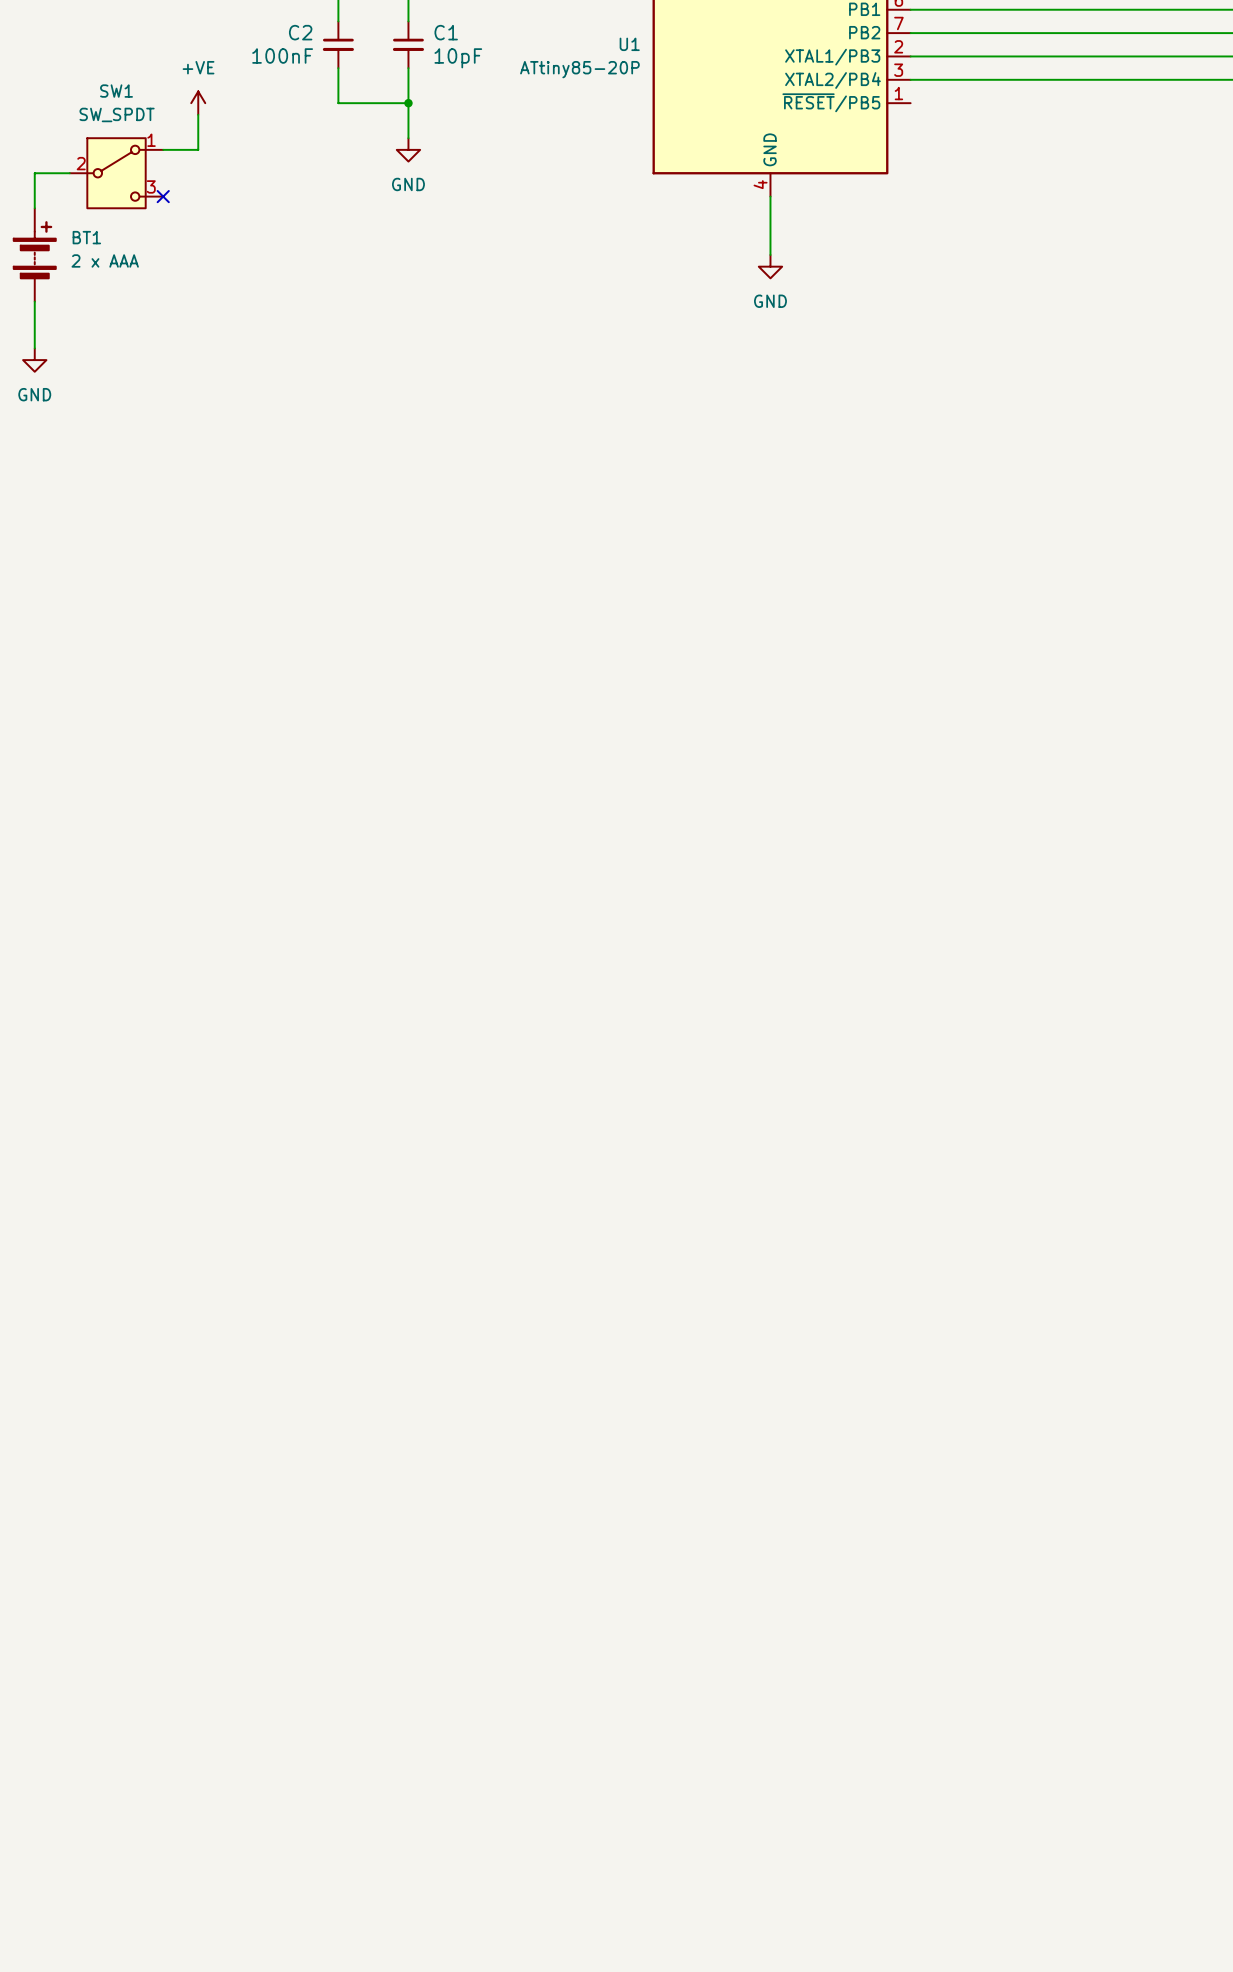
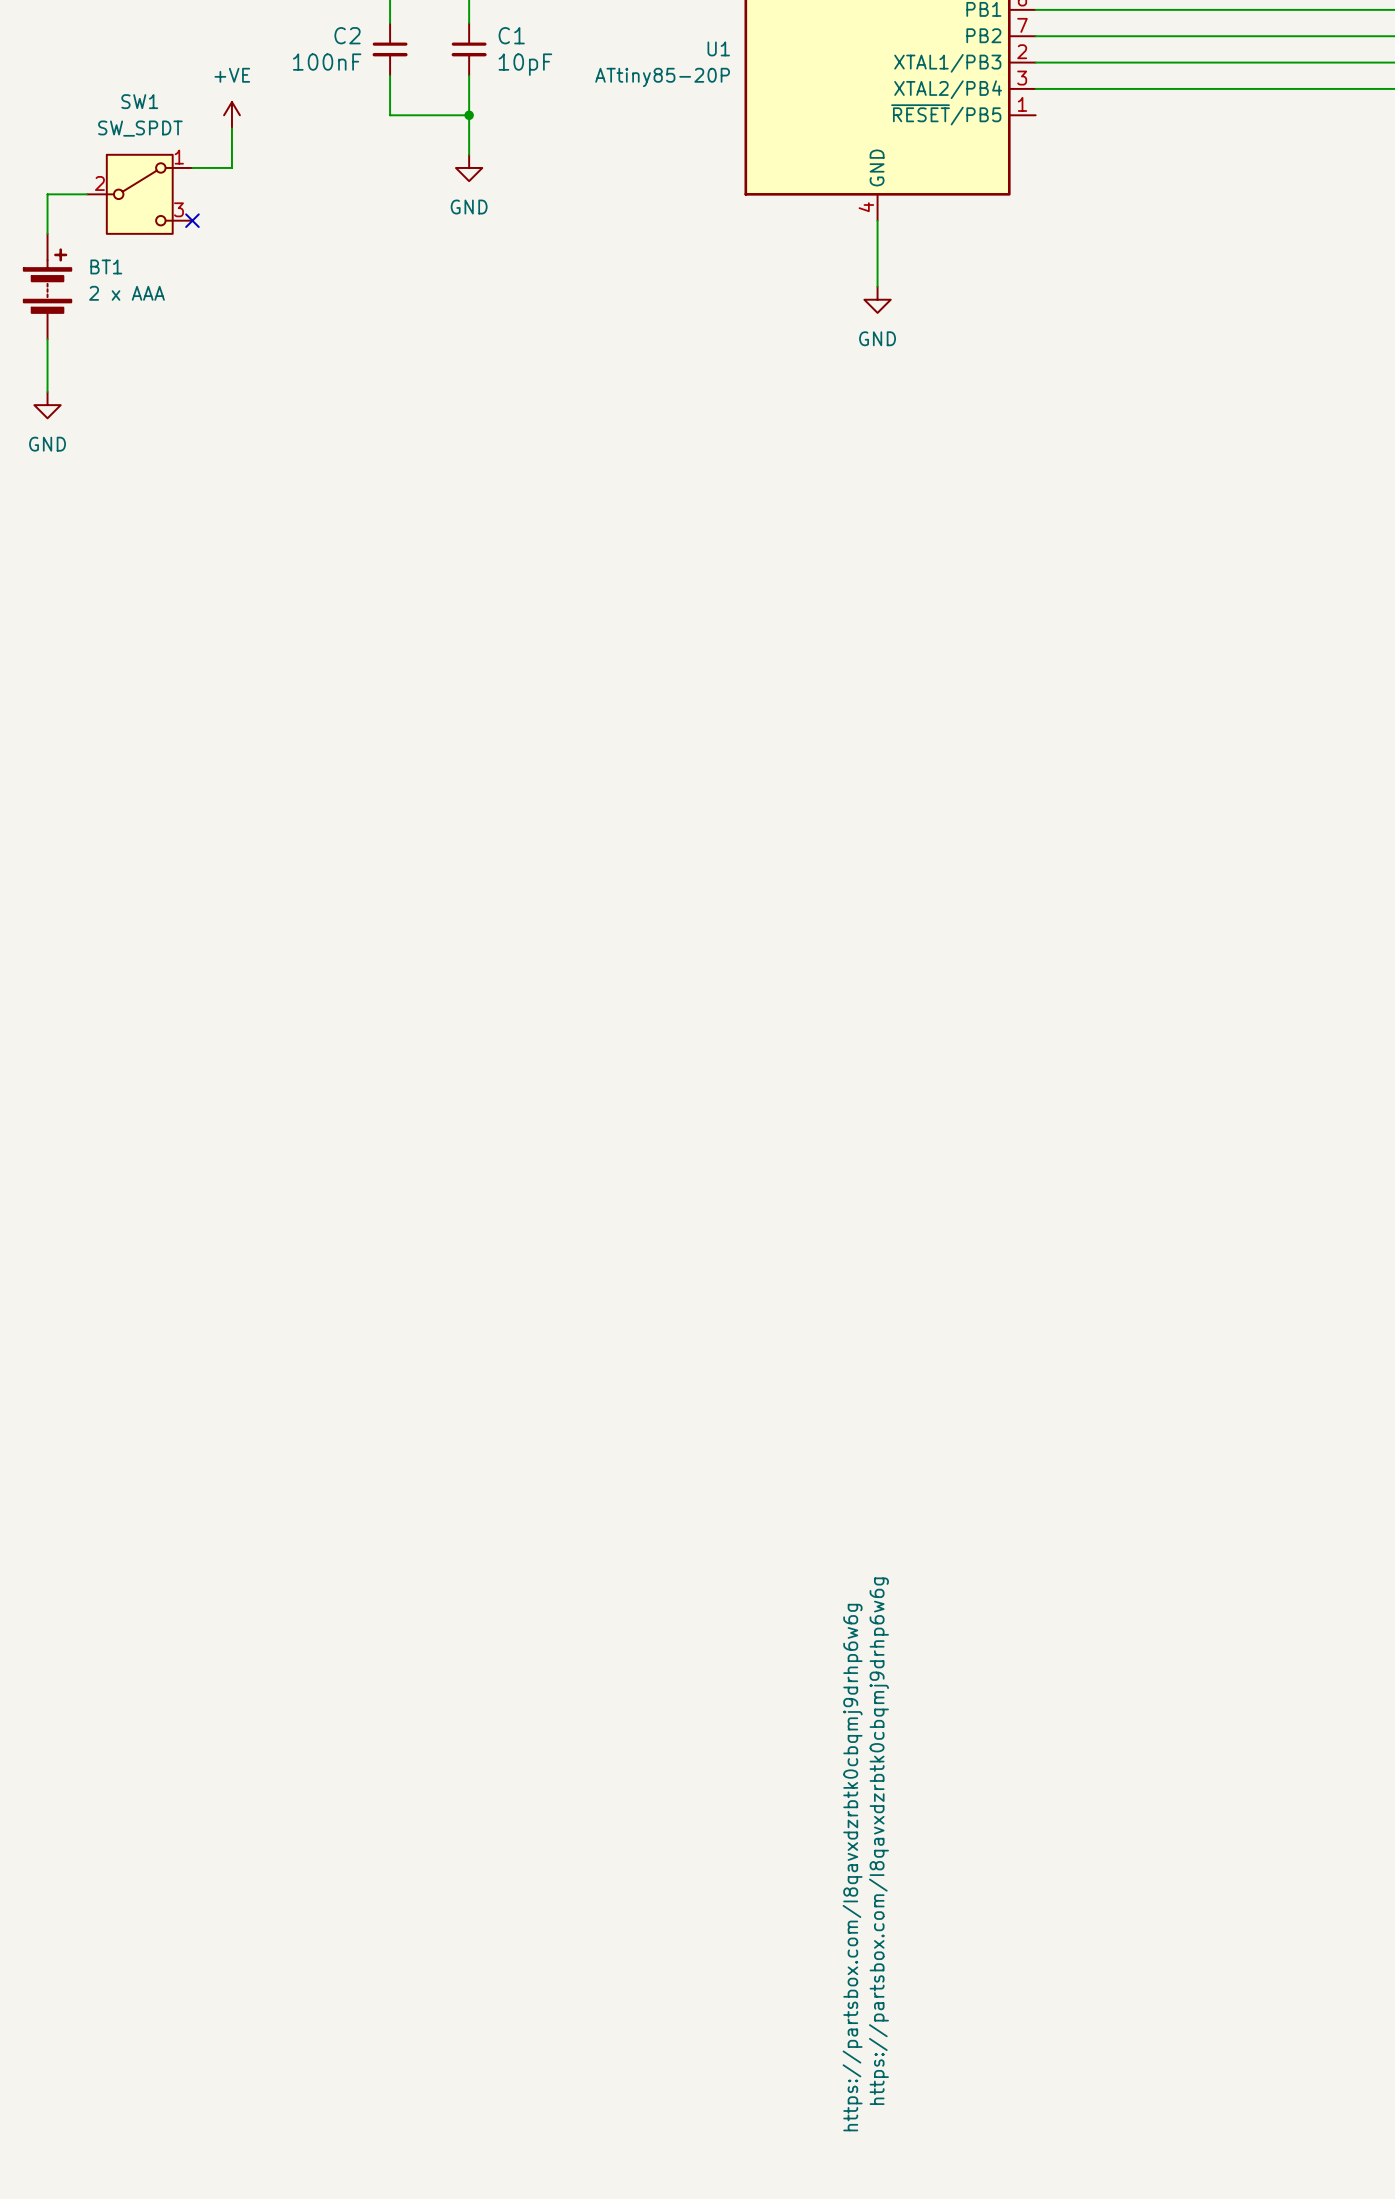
part text: none -> https://partsbox.com/I8qavxdzrbtk0cbqmj9drhp6w6g (878, 1841)
part text: none -> https://partsbox.com/I8qavxdzrbtk0cbqmj9drhp6w6g (852, 1867)

